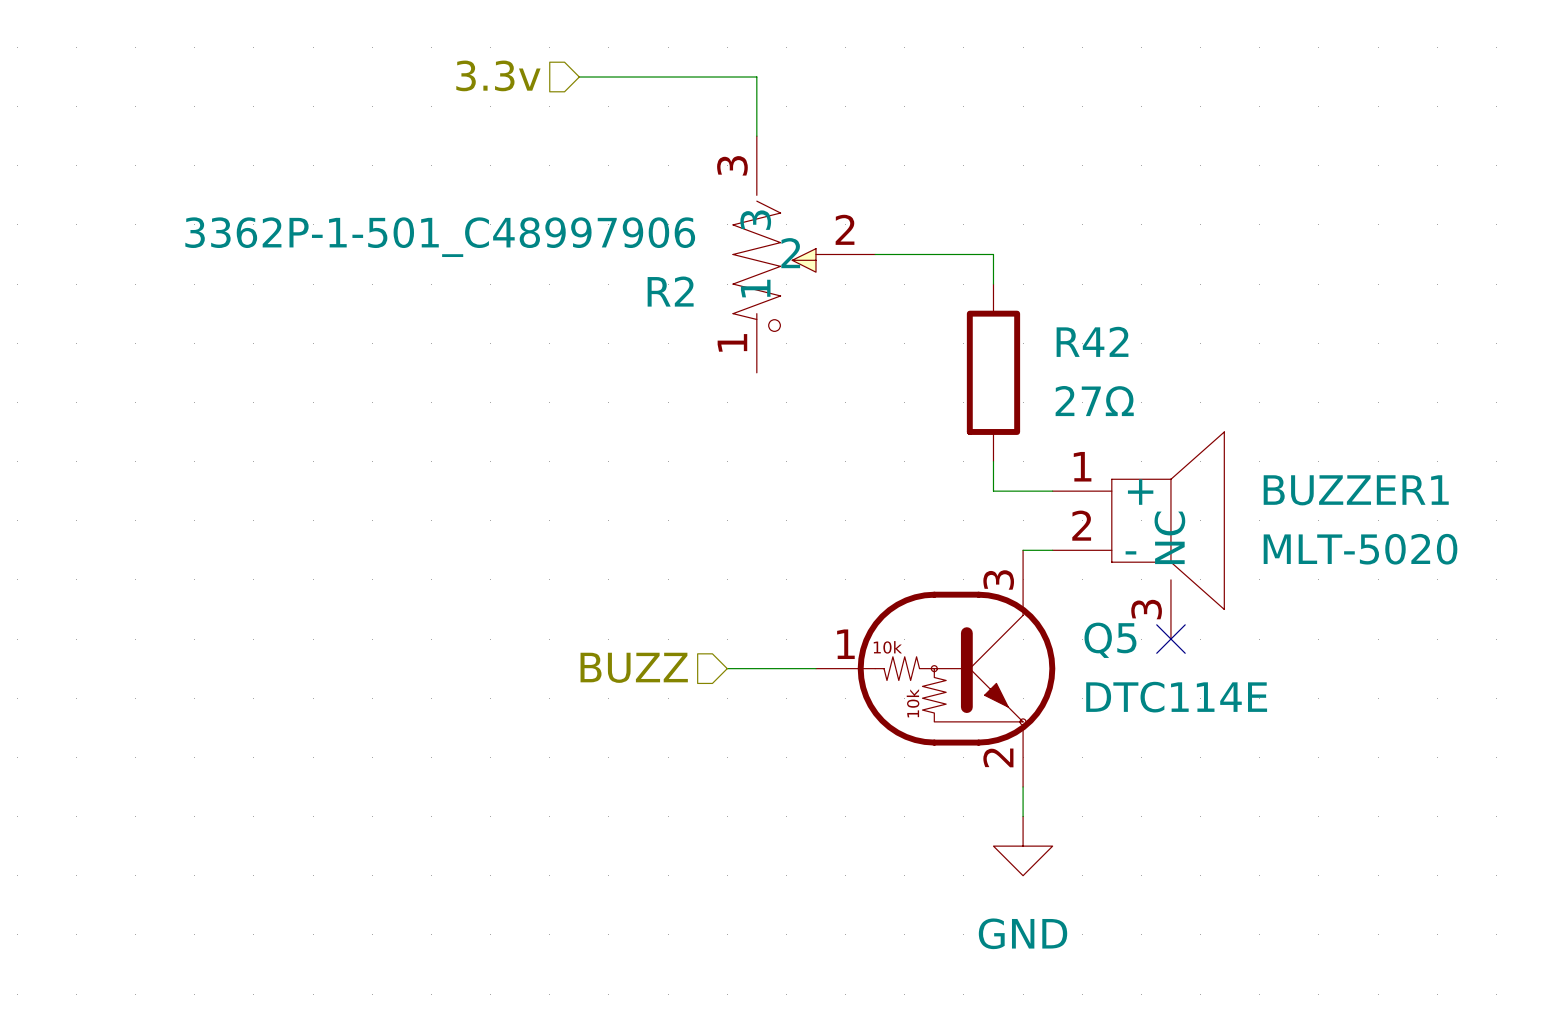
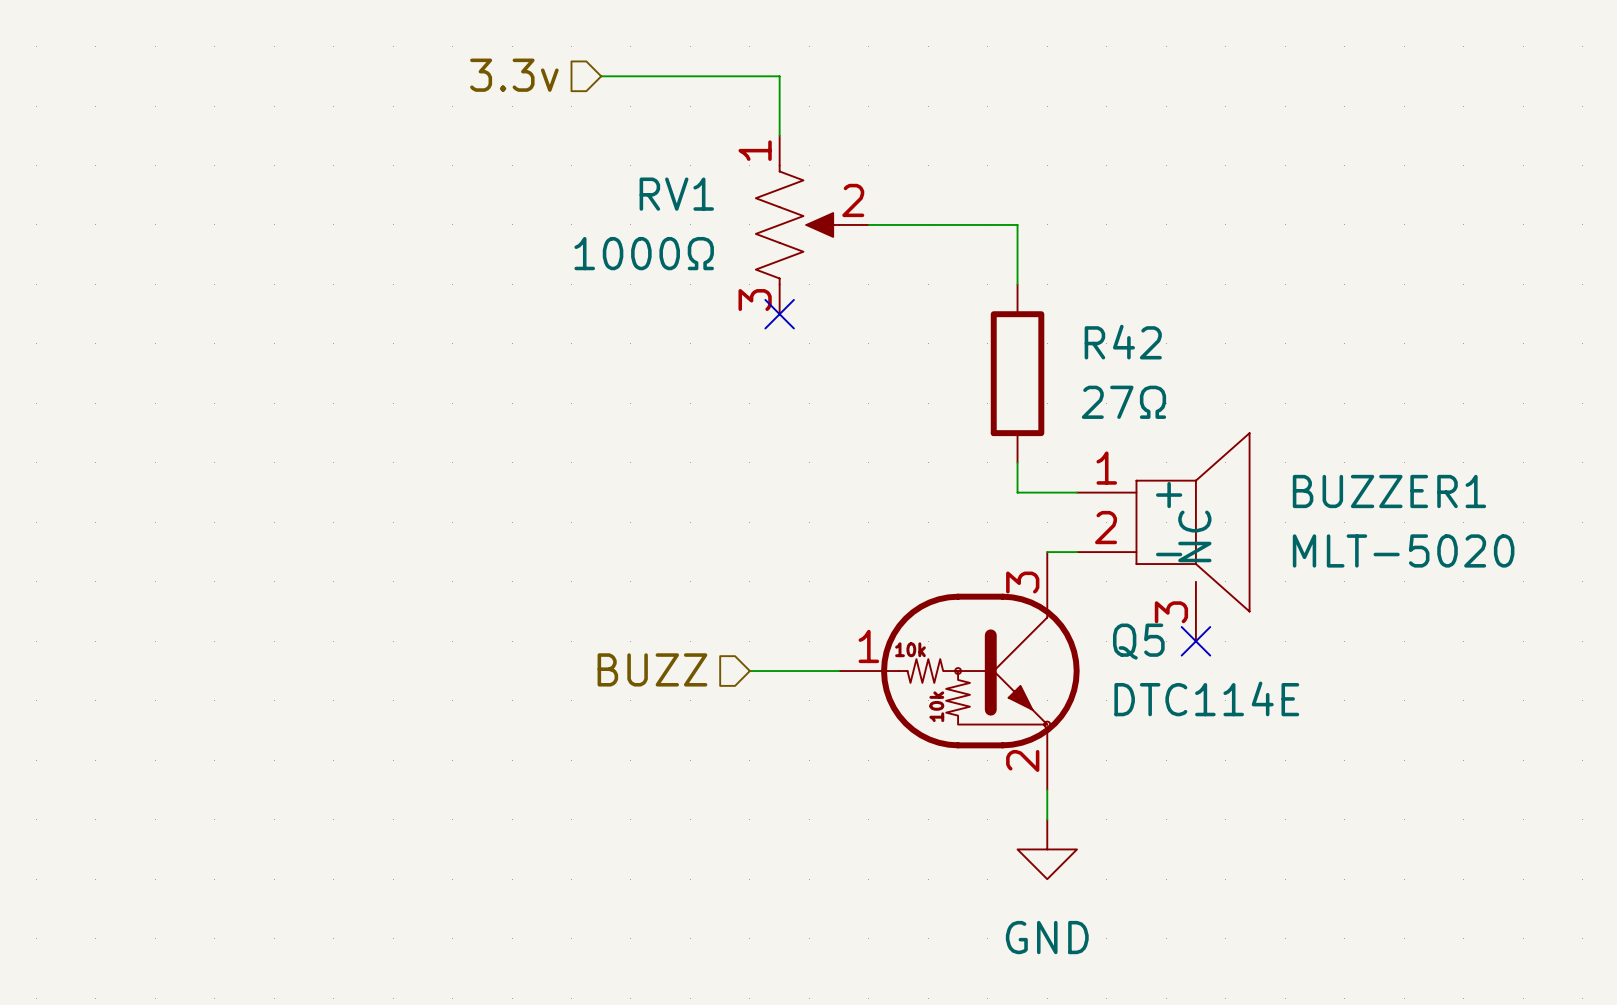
RV1: none -> 1000Ω (812, 224)
R2: 3362P-1-501_C48997906 (804, 254) -> none
wire: (875, 254) (993, 254) -> (868, 224) (1017, 224) (1017, 254)
no-connect mark: none -> (779, 314)

